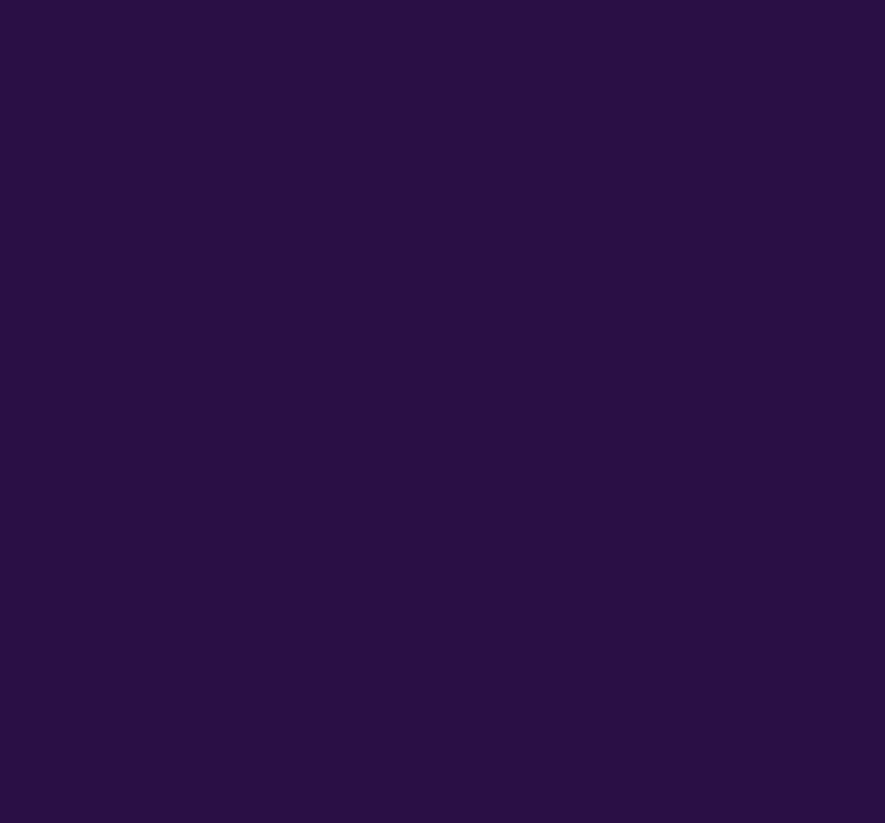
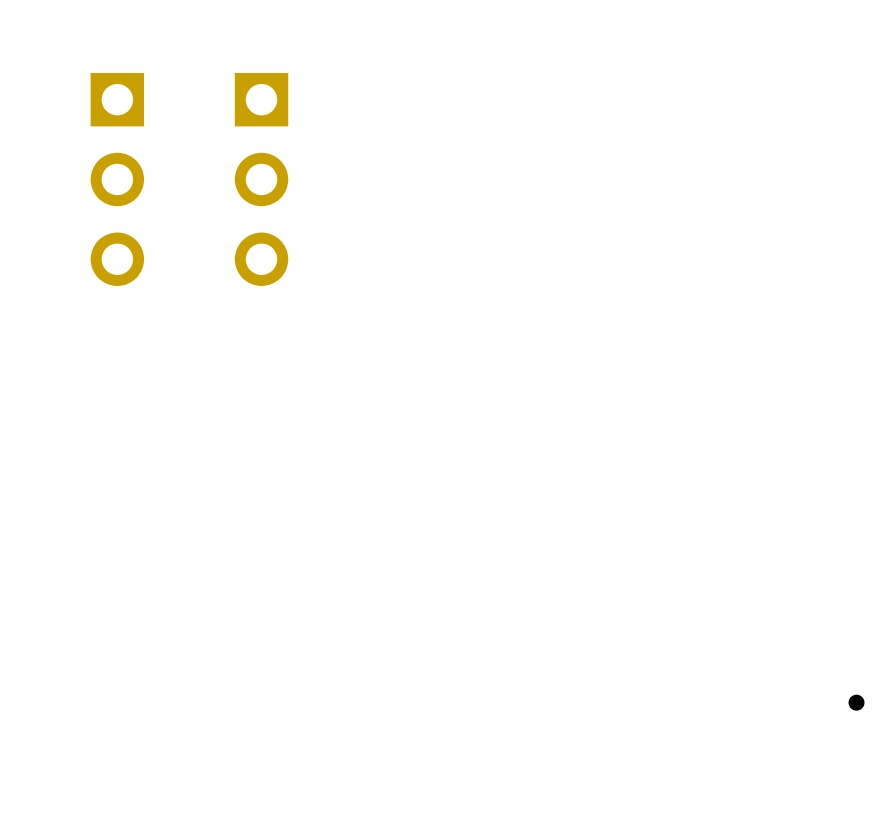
part: none -> (117, 179)
part: none -> (261, 179)
part: none -> (856, 702)

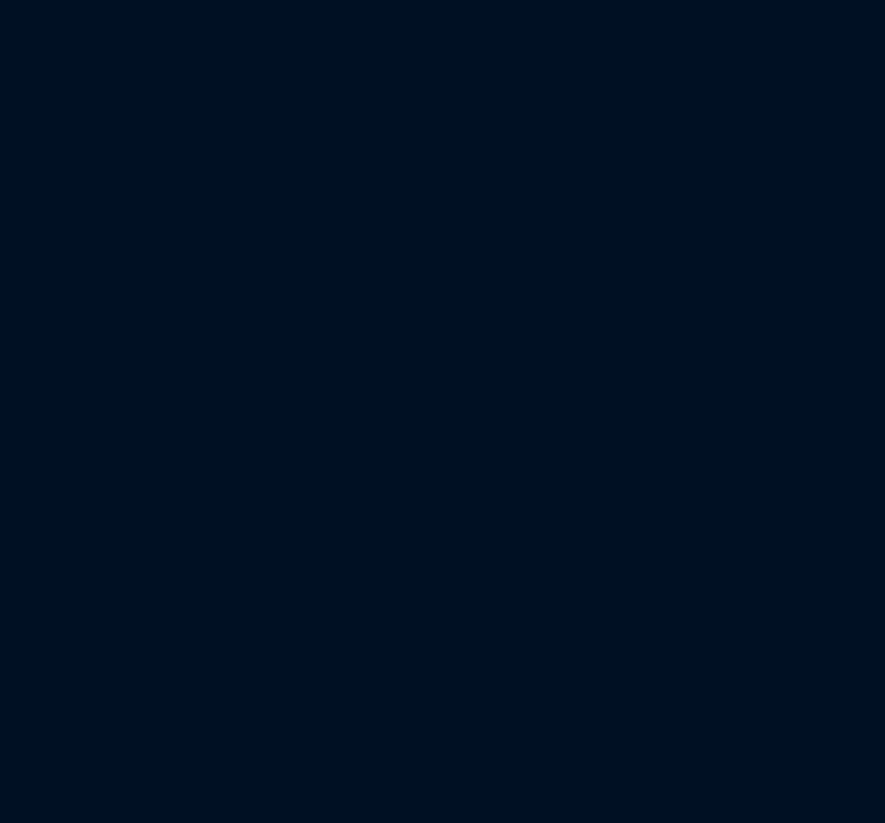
part: (117, 179) -> none
part: (261, 179) -> none
part: (856, 702) -> none

